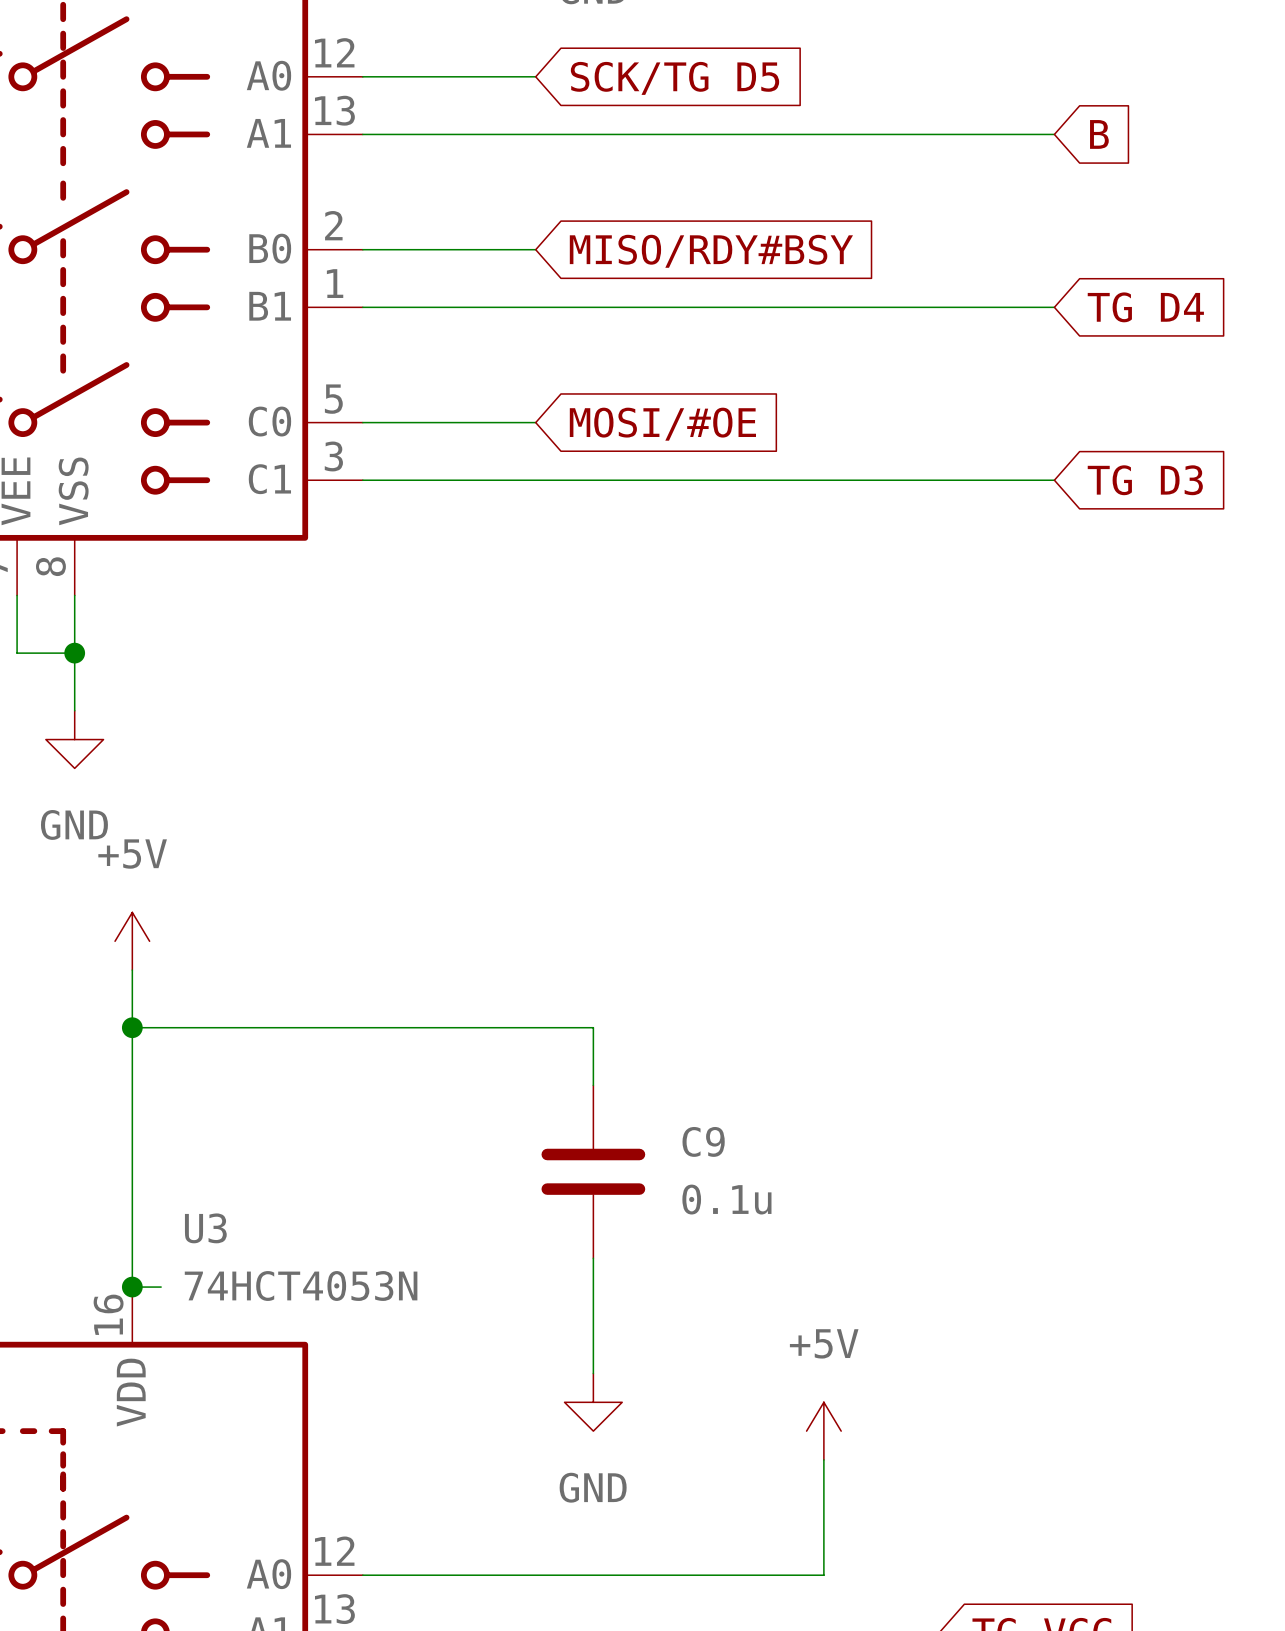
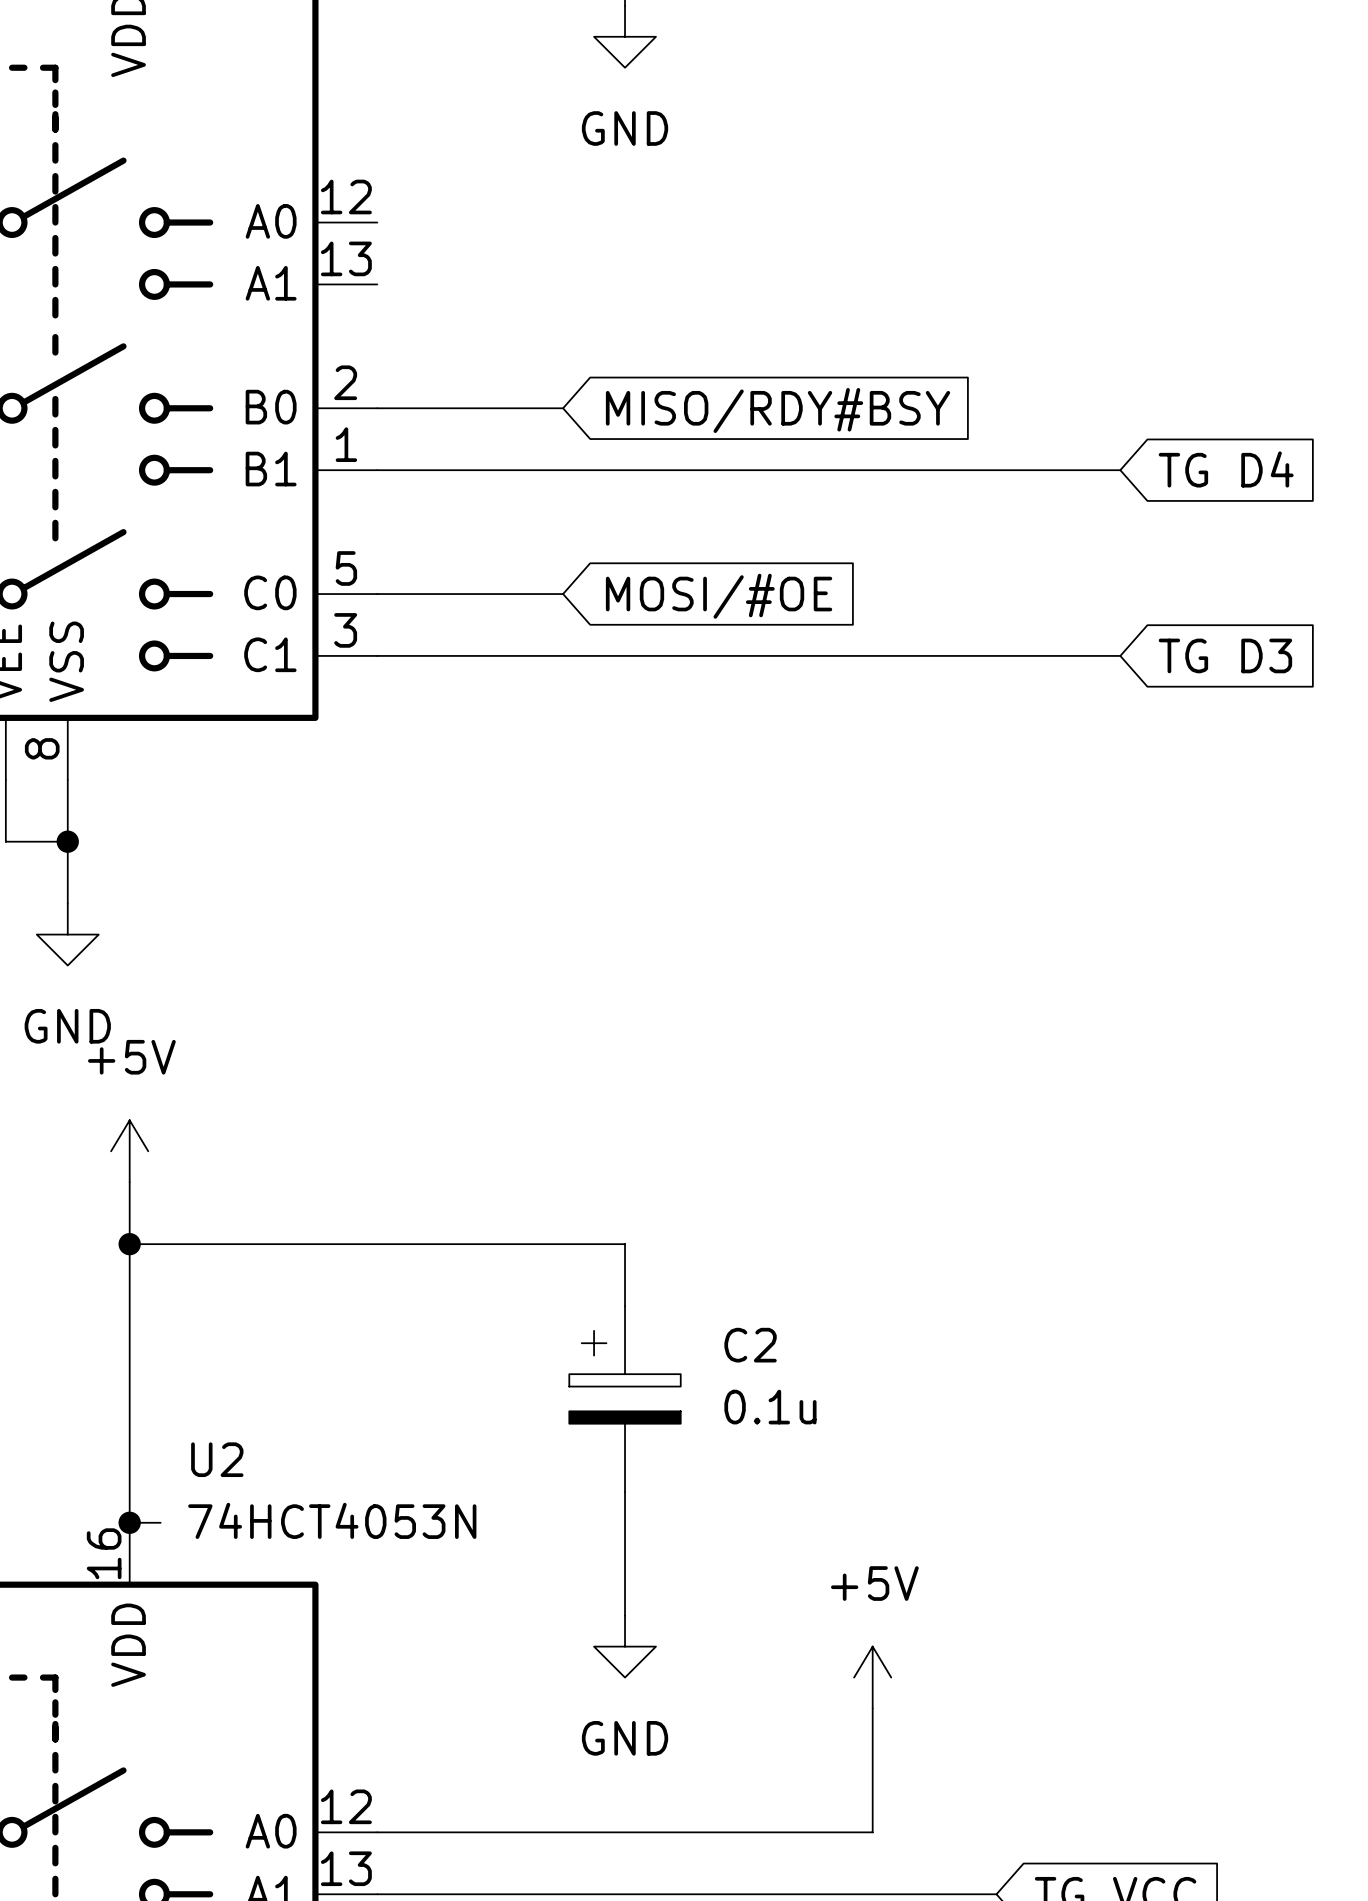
wire: (362, 76) (535, 76) -> none
global label: SCK/TG D5 (675, 78) -> none
wire: (362, 134) (1054, 134) -> none
global label: B (1099, 134) -> none
C9: 0.1u (593, 1171) -> none
C2: none -> 0.1u (625, 1398)
U3 name: U3 (205, 1228) -> U2 (217, 1459)

